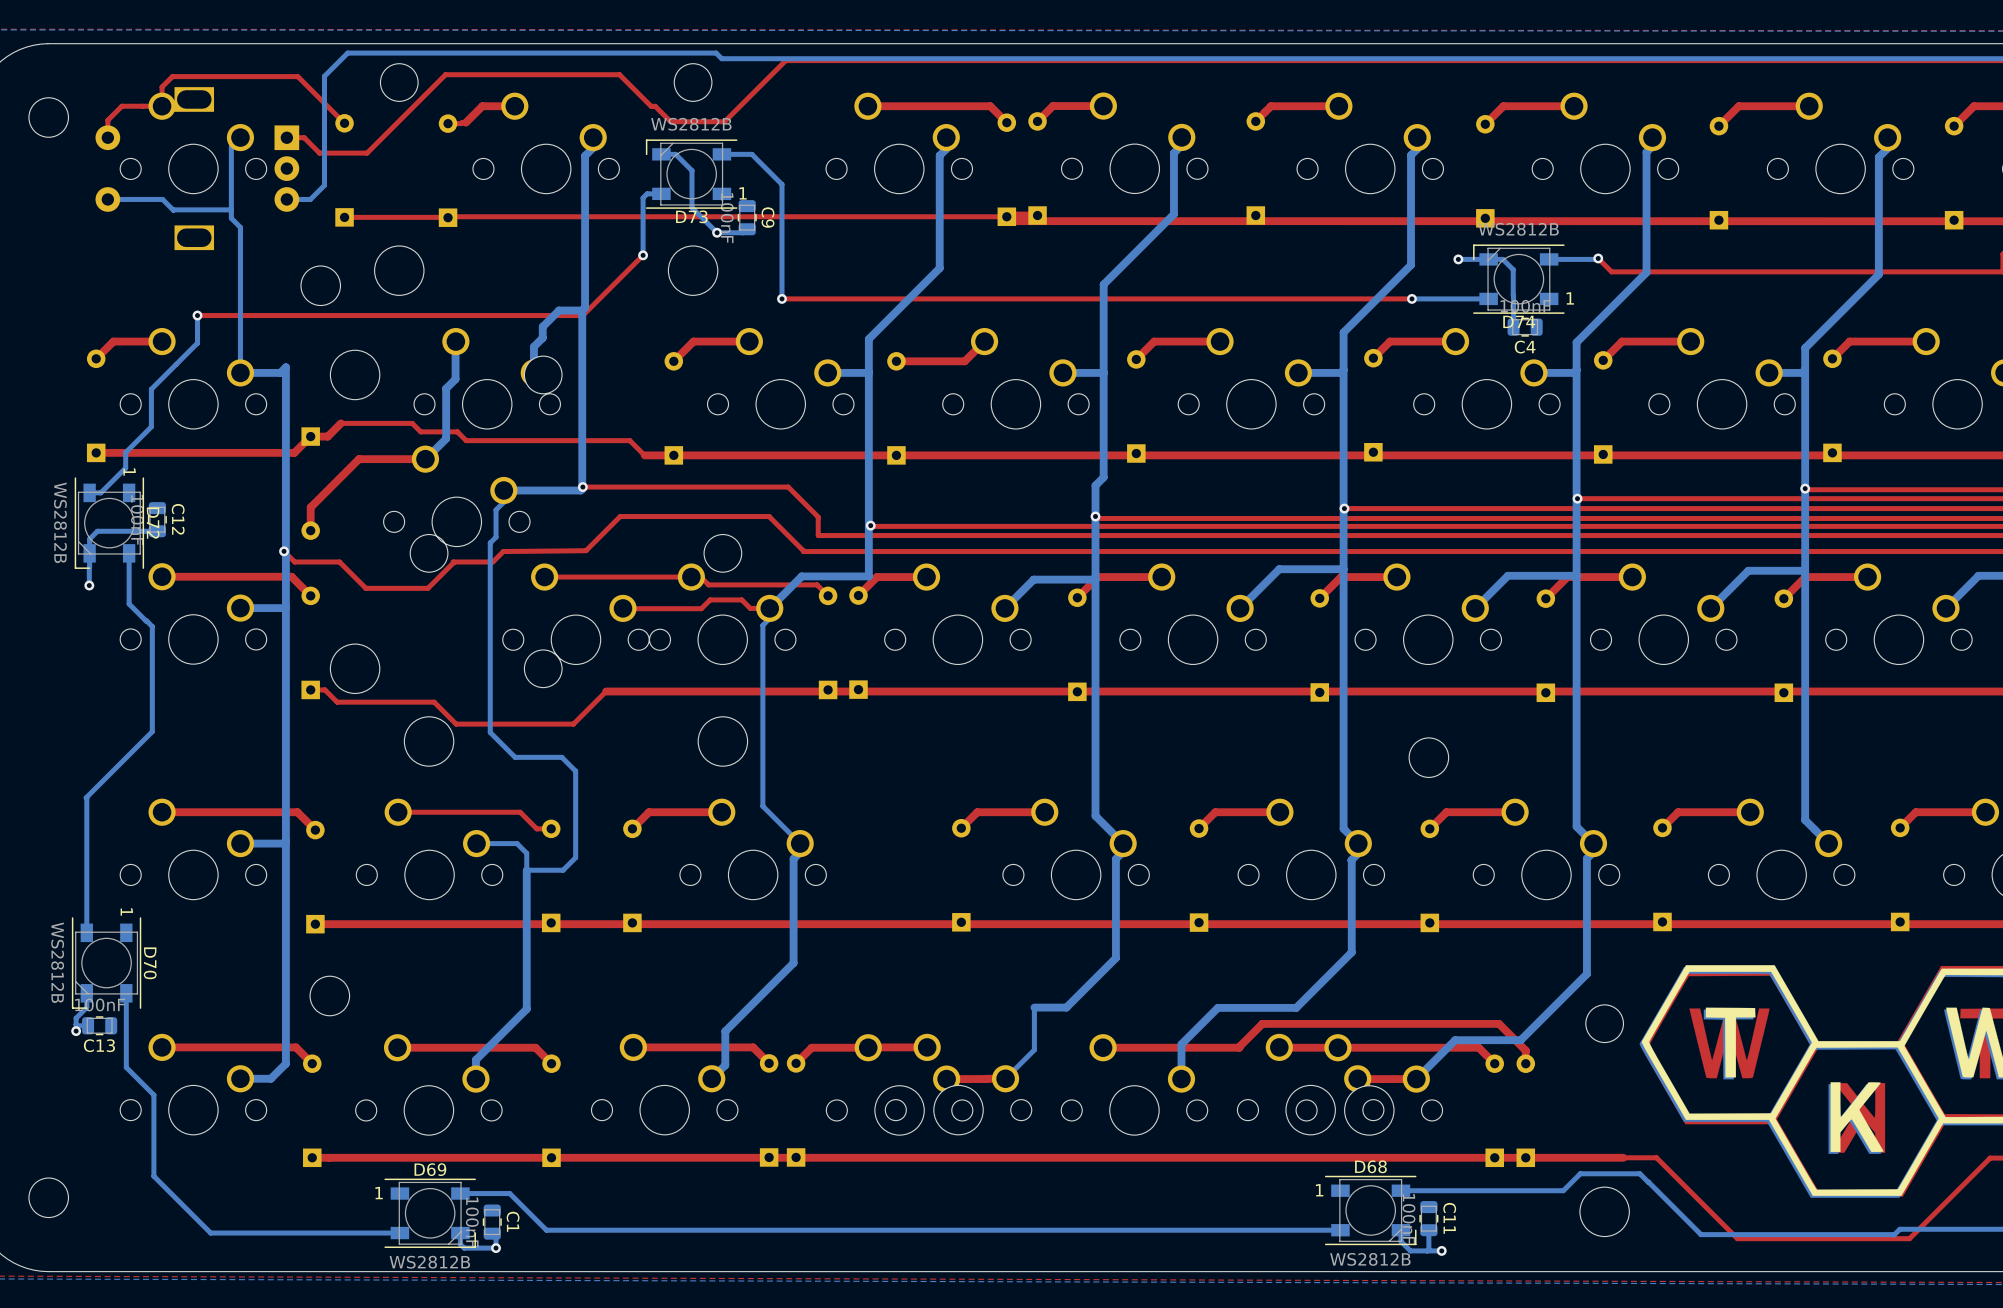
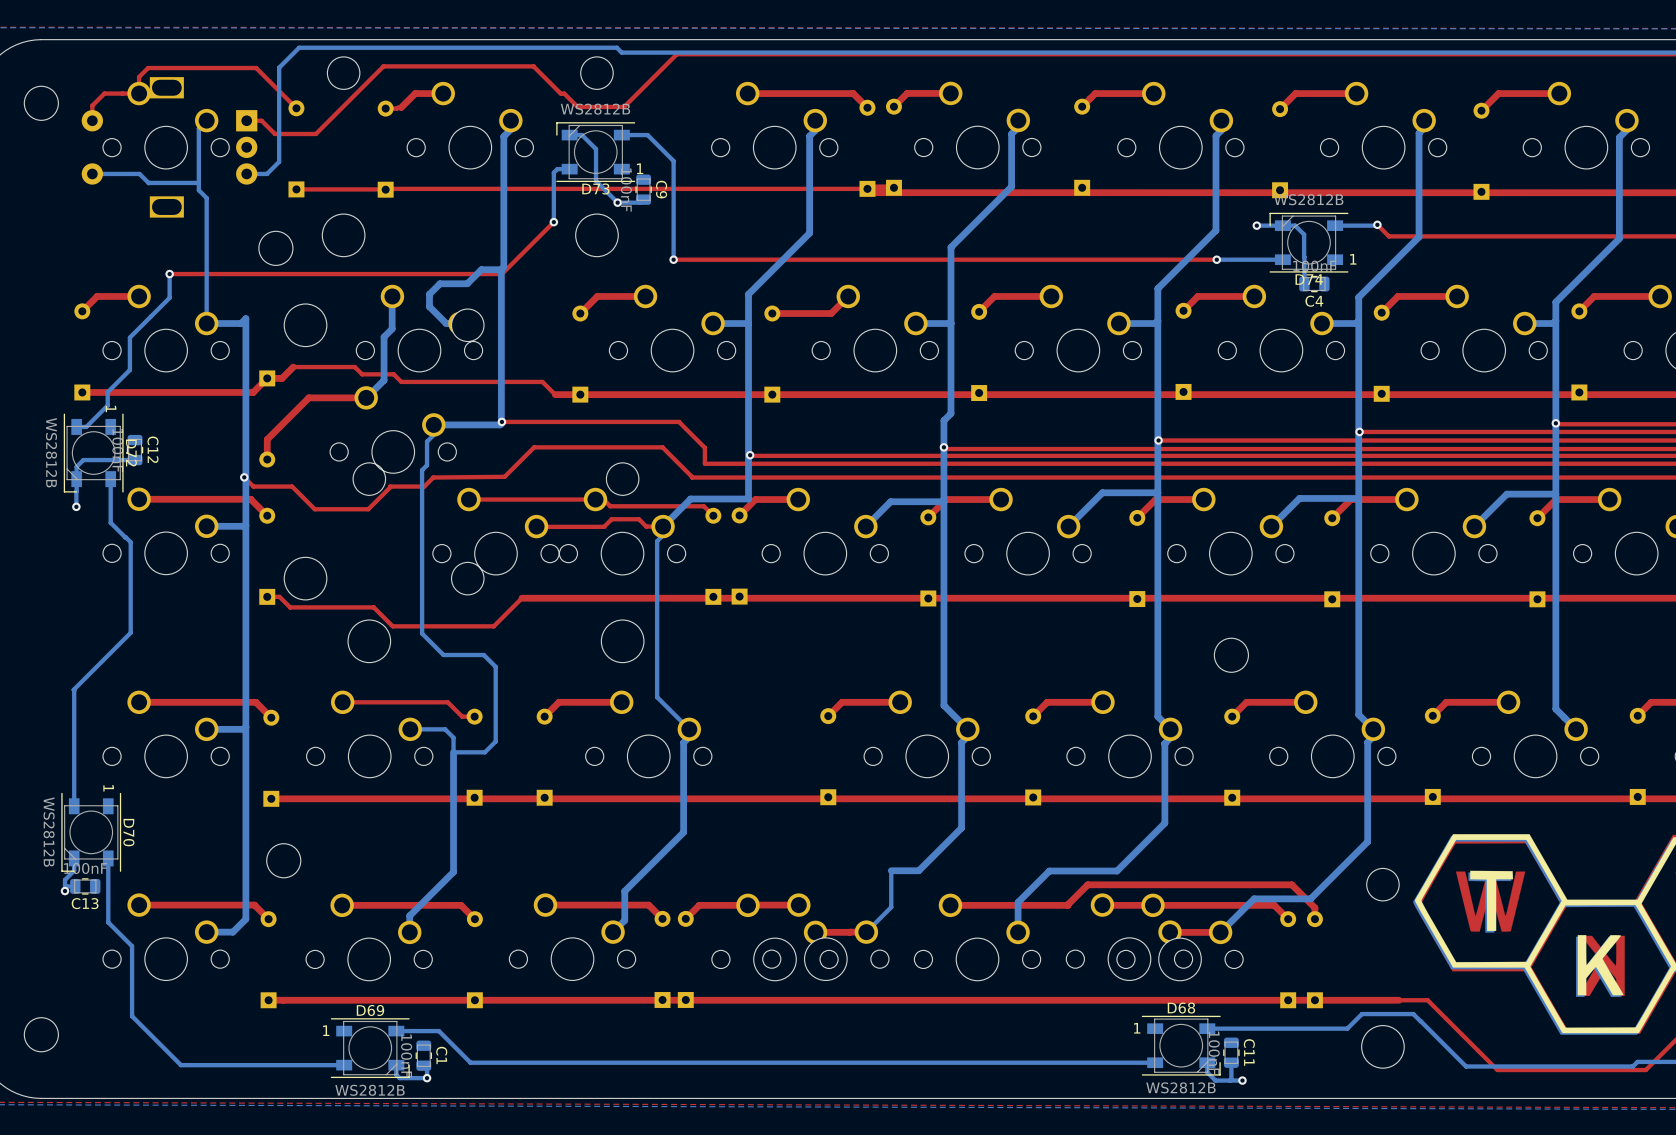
bottom track: (542, 326) (542, 337) (533, 346) (533, 372) -> (467, 283) (440, 283) (429, 294) (429, 306) (446, 323) (458, 323)

